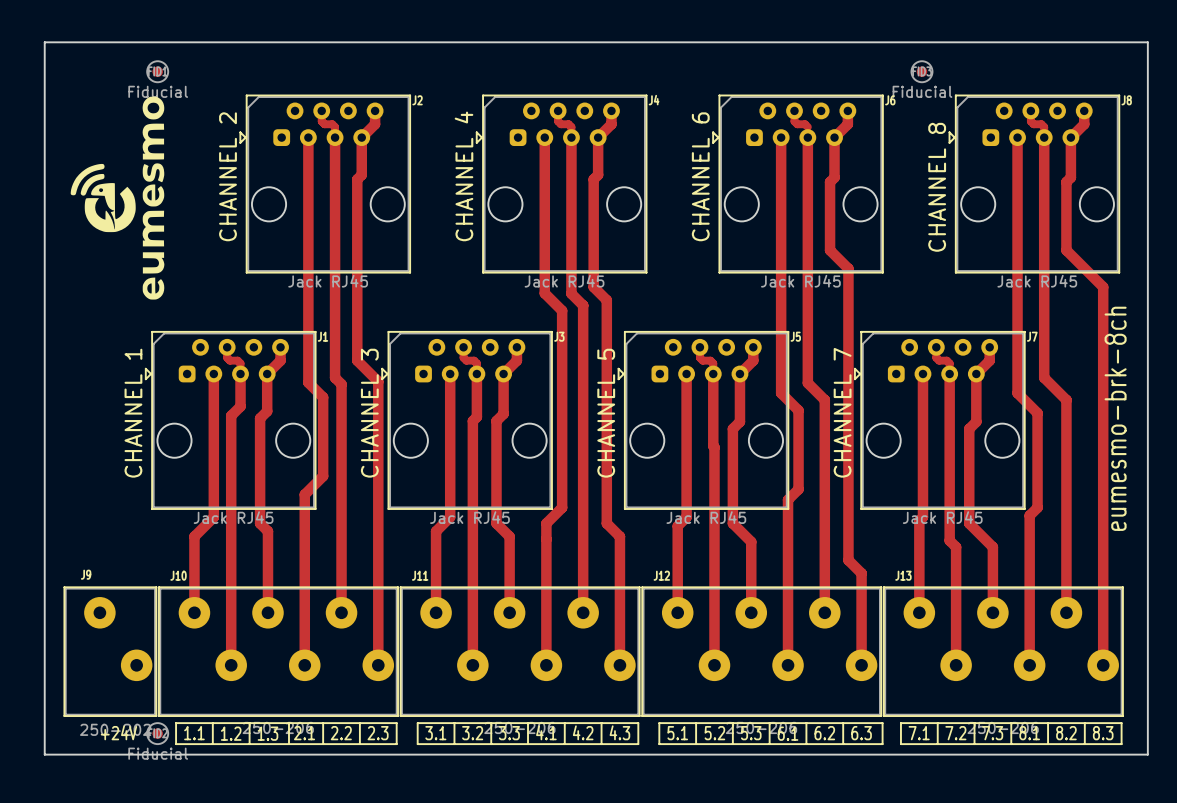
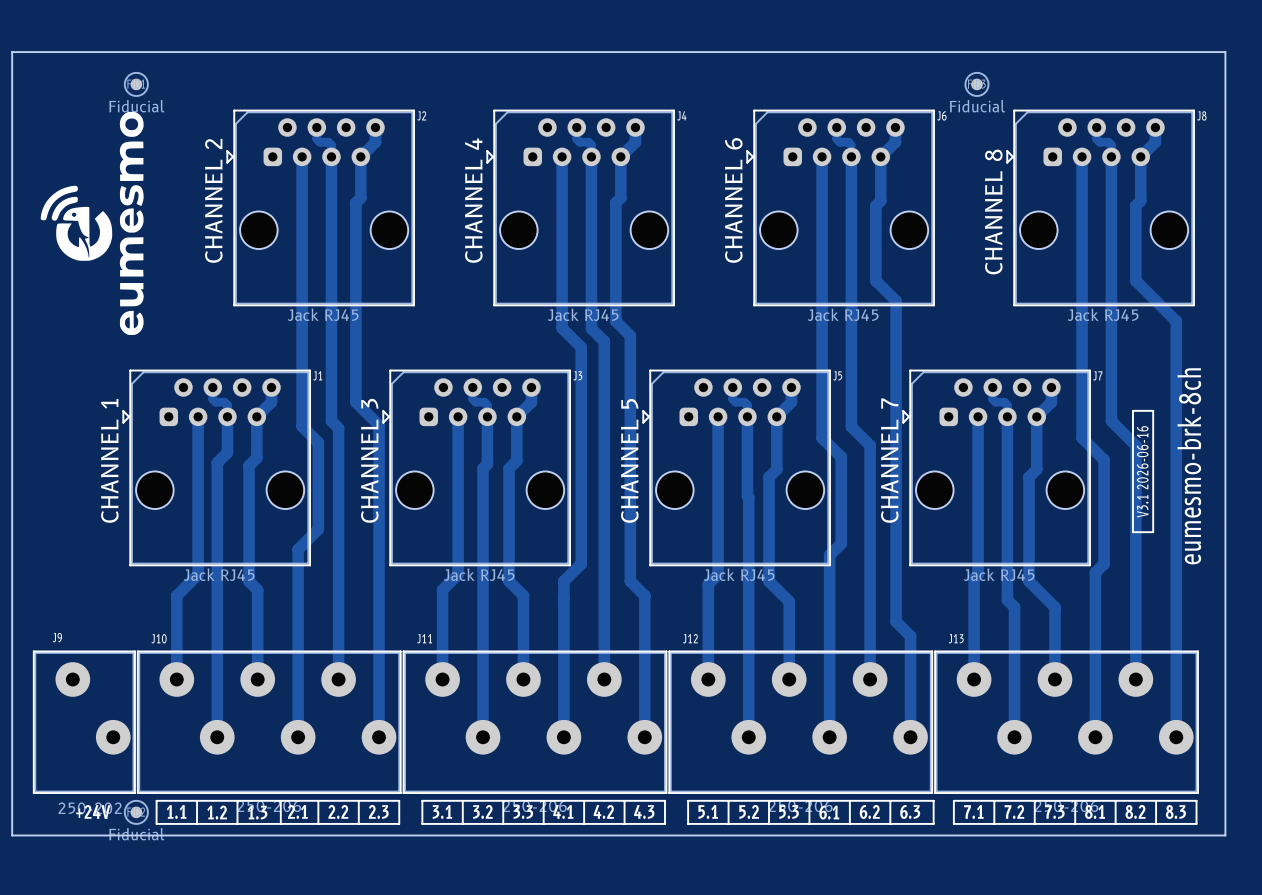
line: none -> (1132, 410) (1153, 410) (1153, 532) (1132, 532) (1132, 410)
text: none -> V3.1 2026-06-16 (1142, 471)

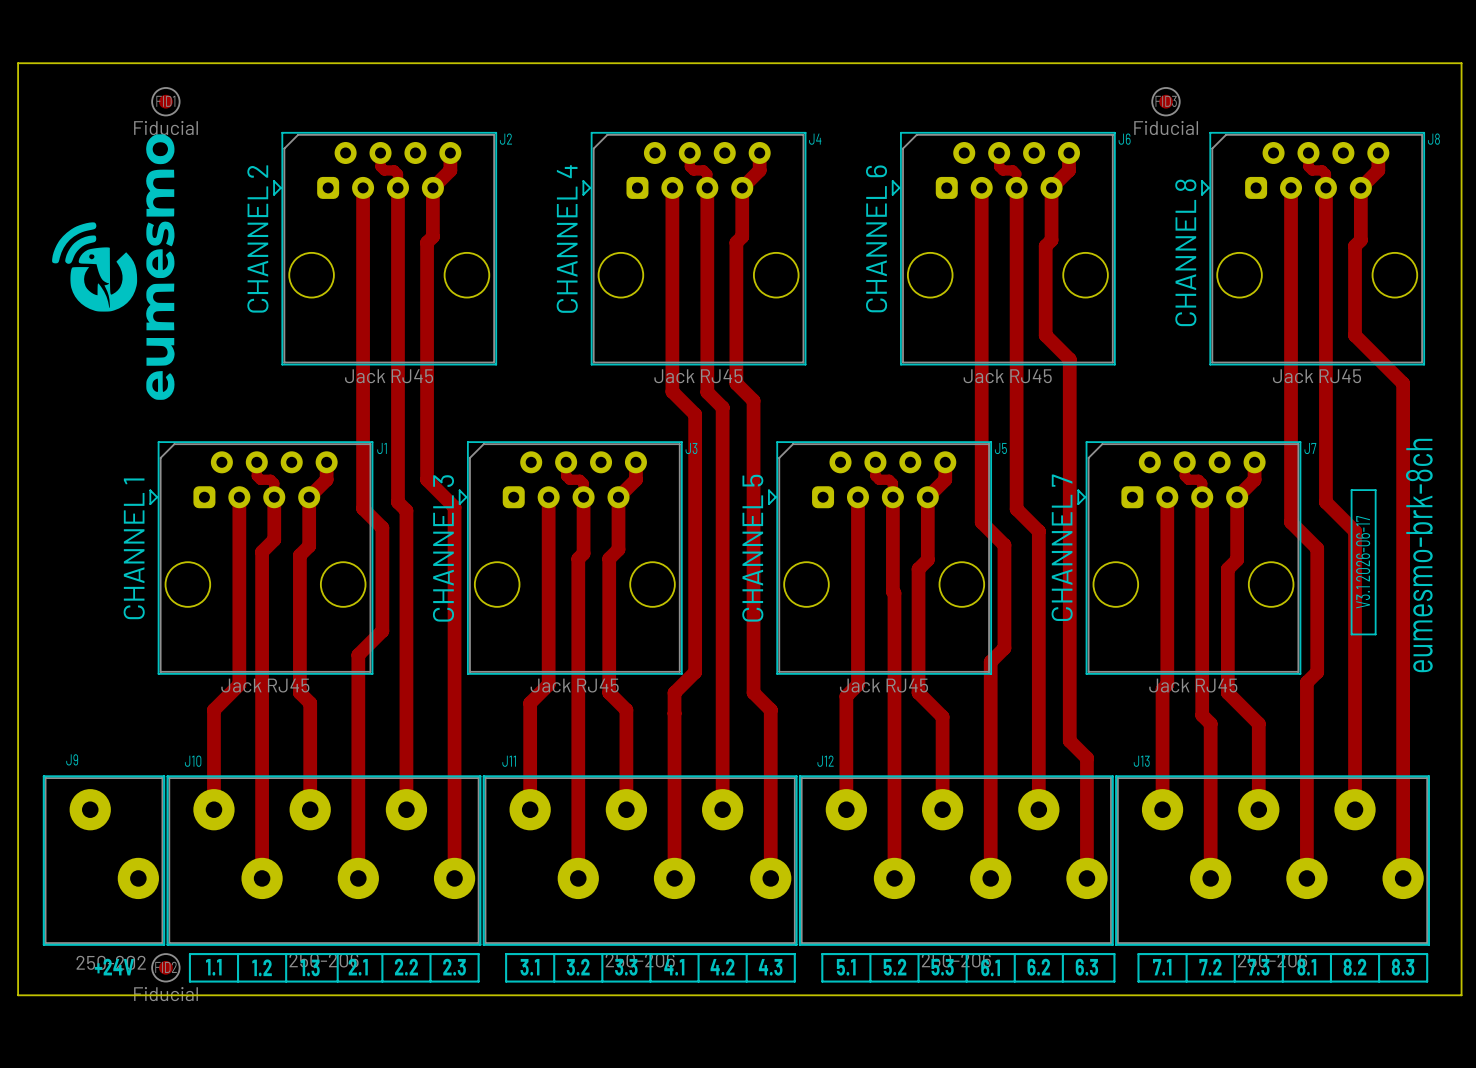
text: V3.1 2026-06-16 (1142, 471) -> V3.1 2026-06-17 (1363, 562)

